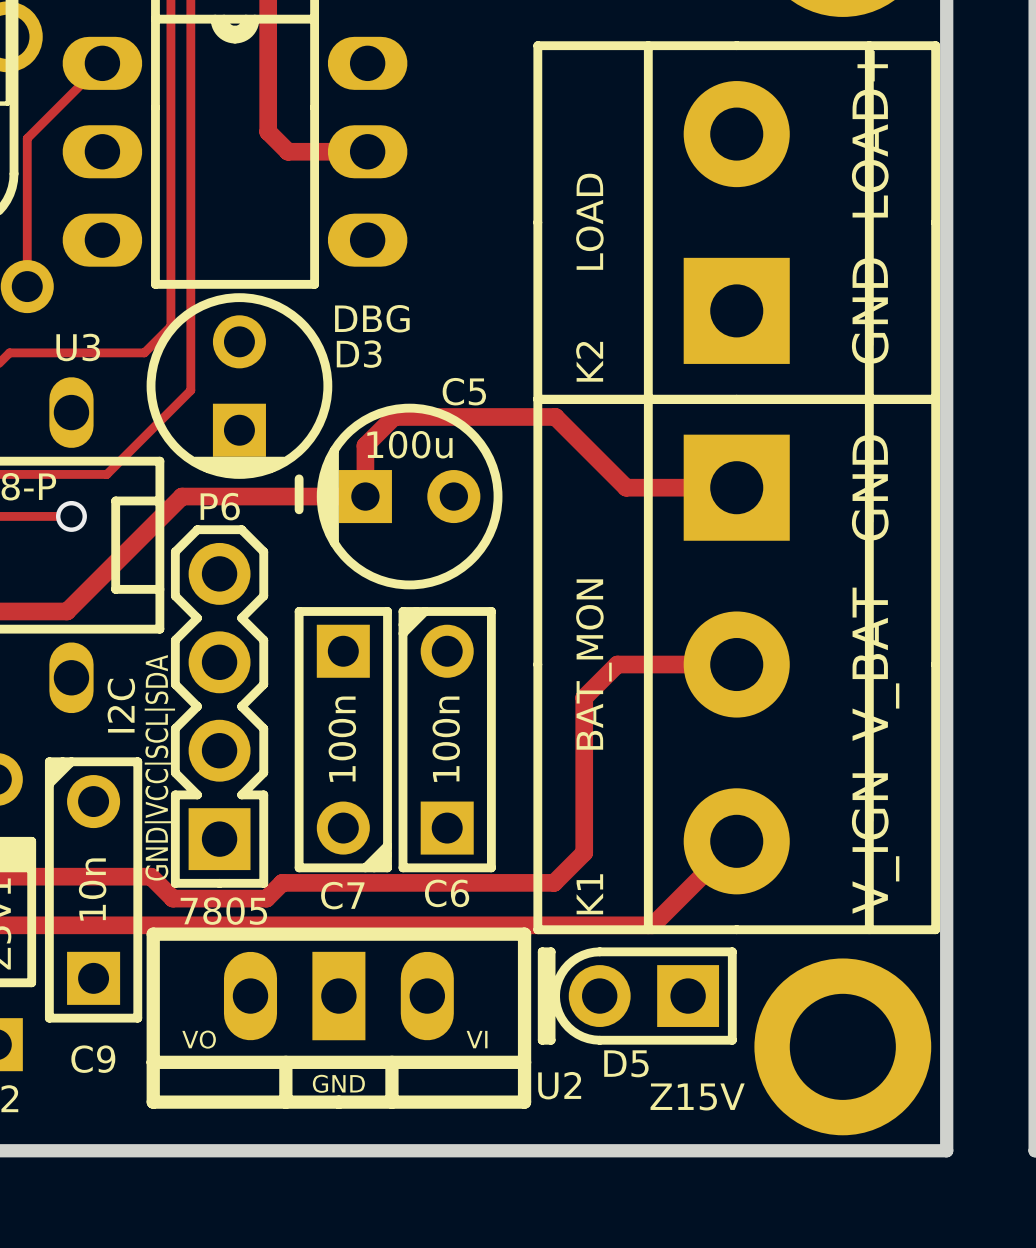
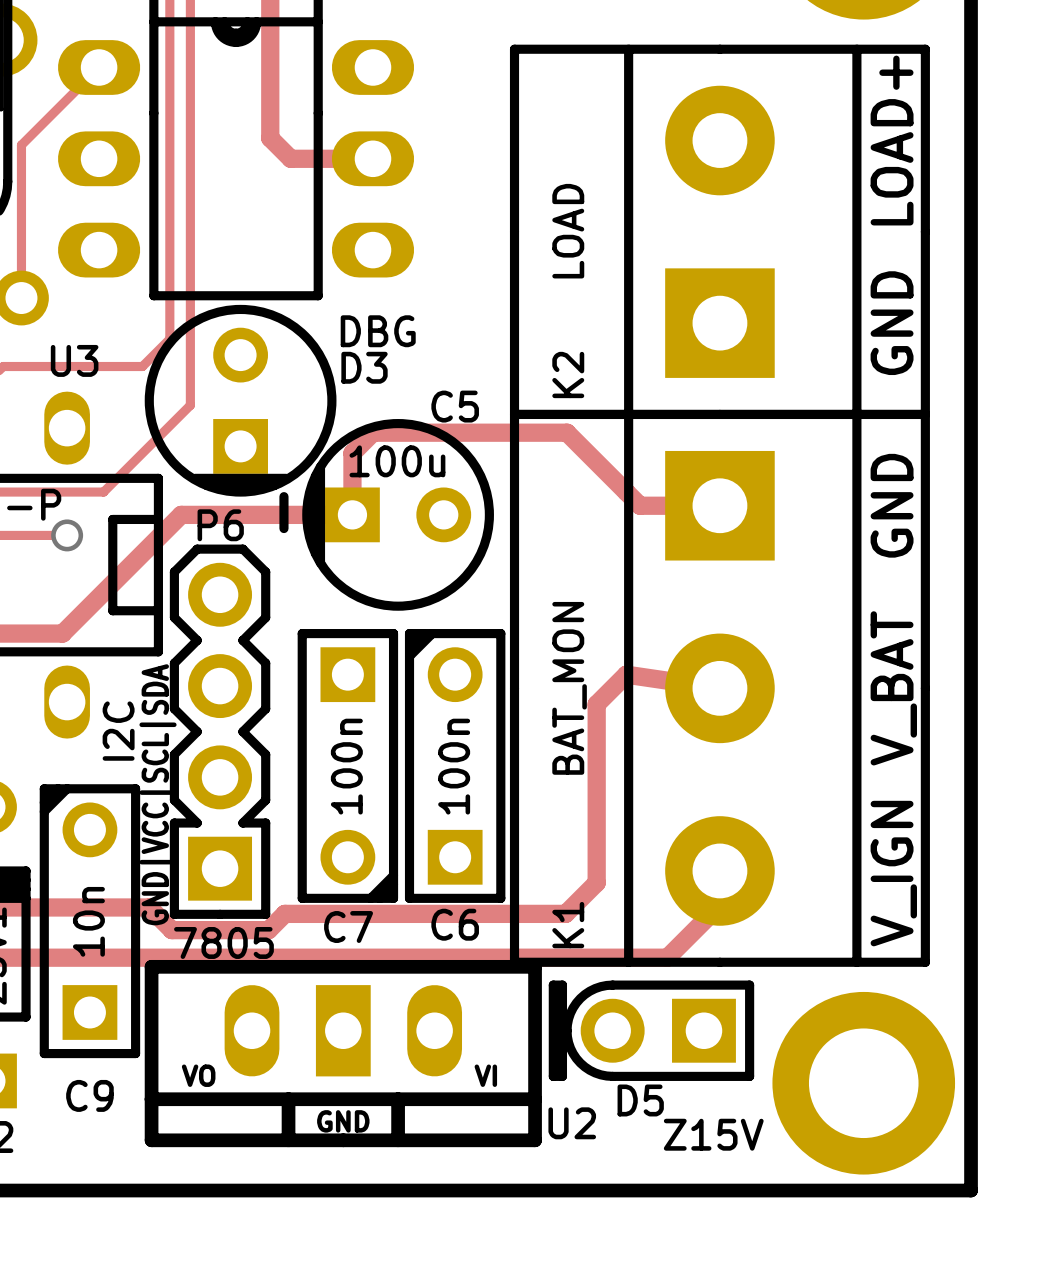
K2 position: (736, 222) -> (719, 231)
track: (394, 416) (365, 445) (365, 496) (347, 496) -> (400, 432) (372, 432) (352, 453) (352, 514)
C5 position: (398, 496) -> (386, 514)
track: (736, 664) (617, 664) (584, 697) -> (719, 688) (626, 674) (596, 704) (596, 722)
K1 position: (736, 664) -> (719, 688)

